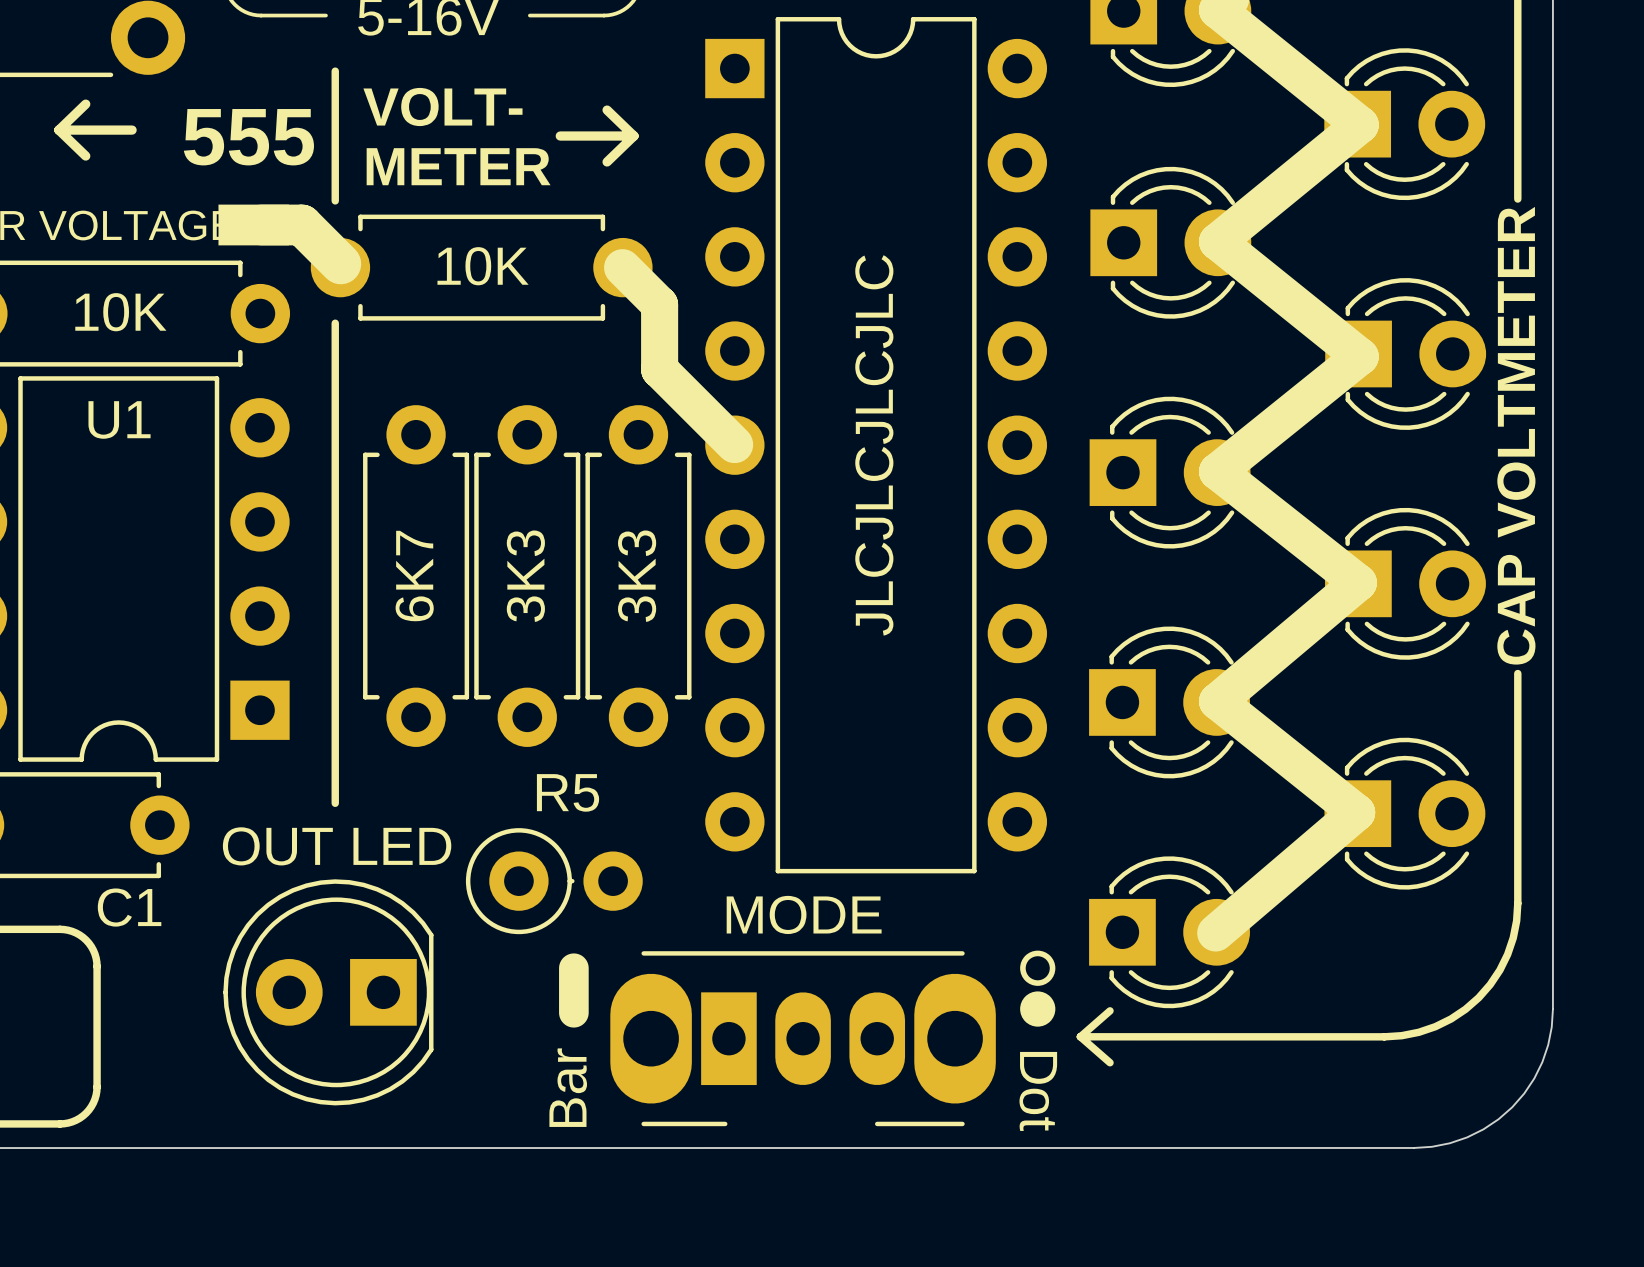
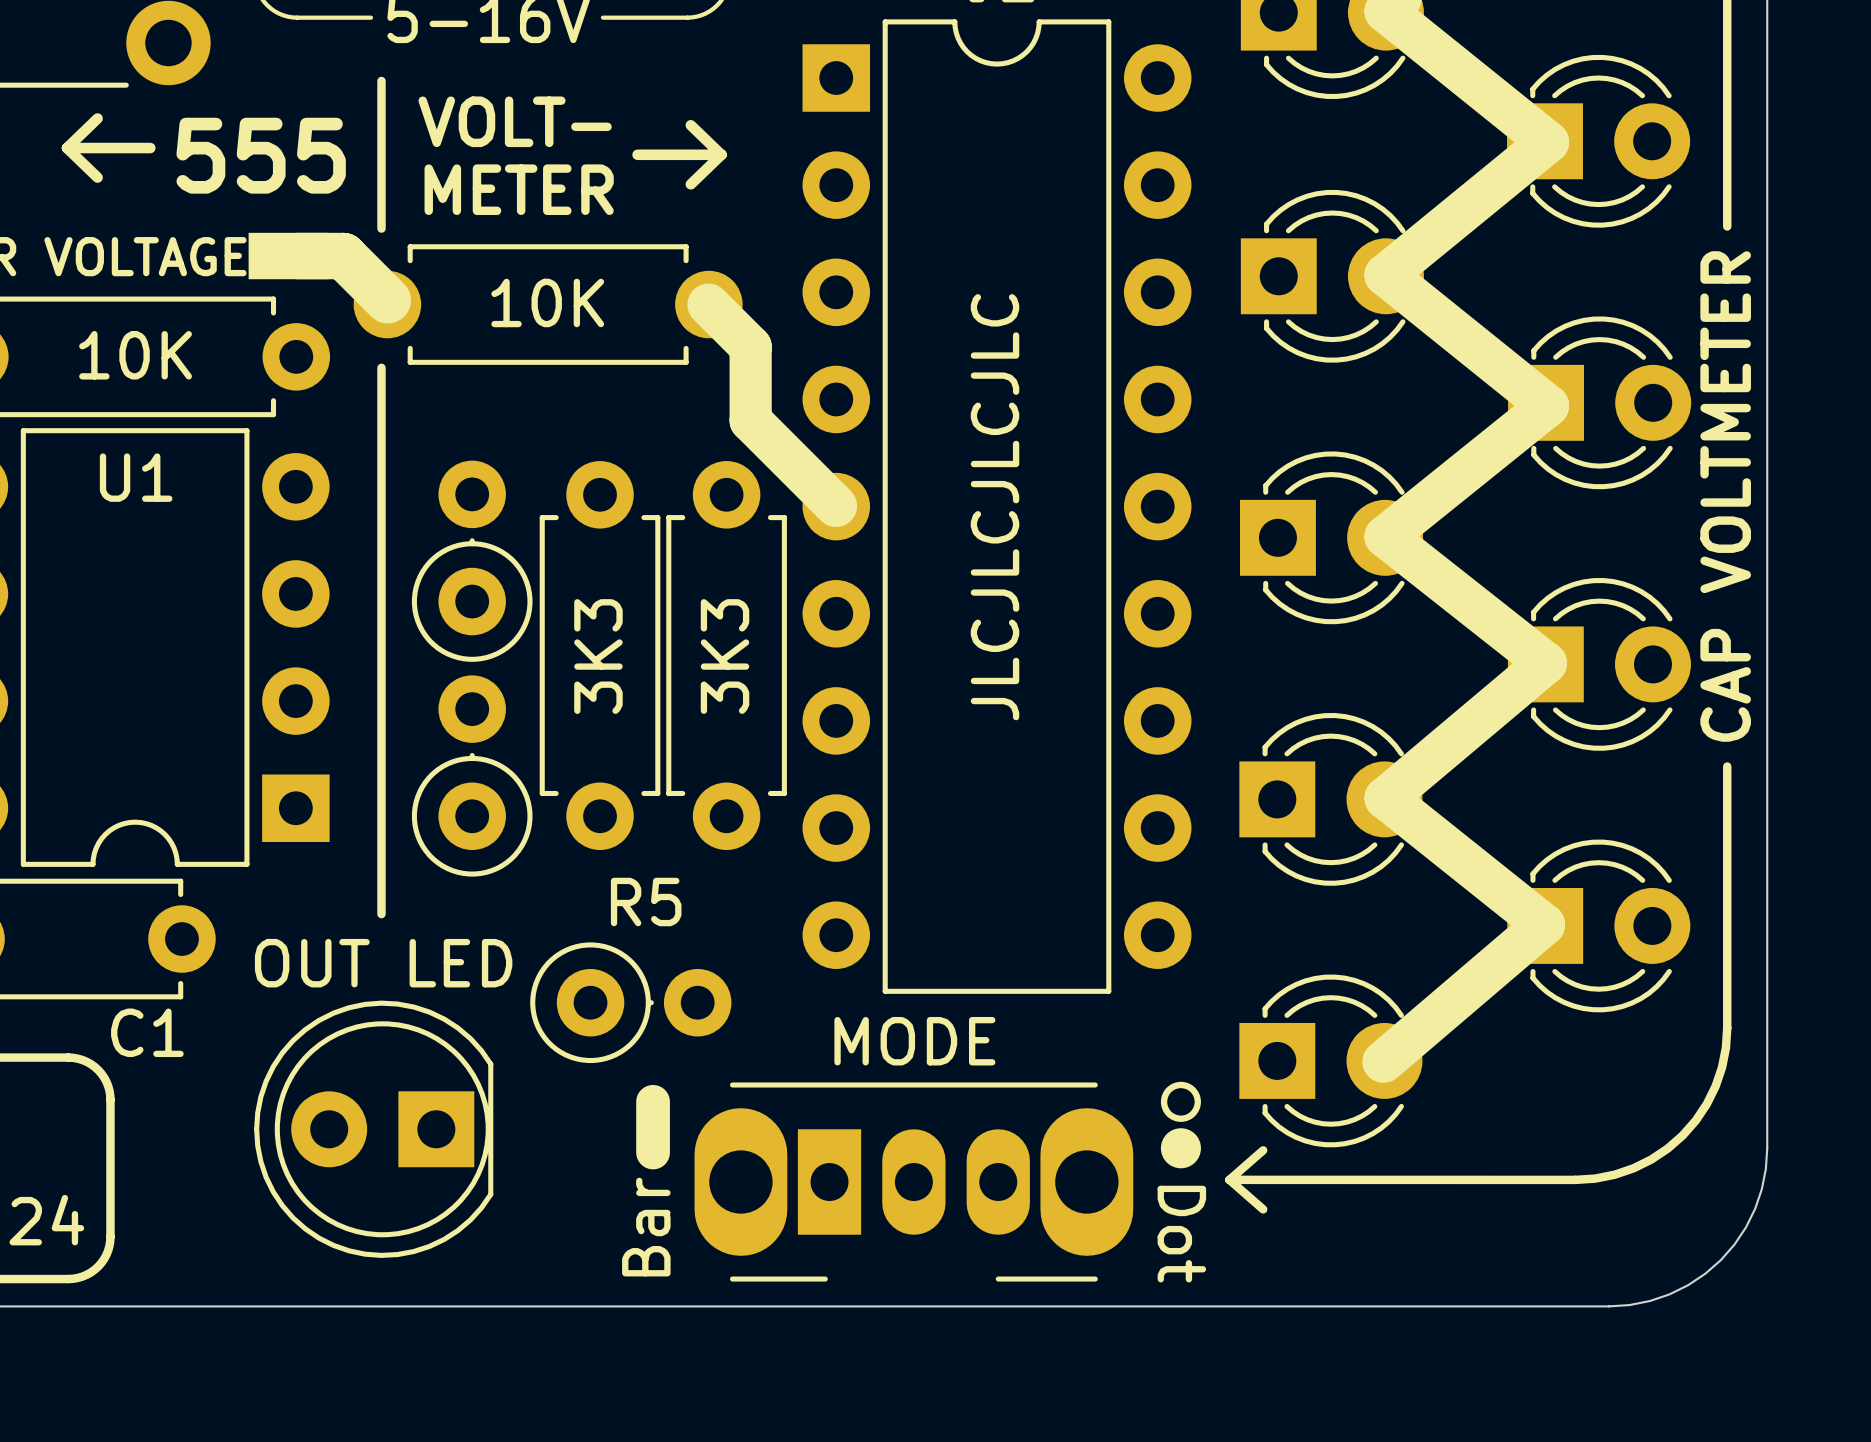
part: none -> (472, 561)
part: 6K7 (416, 576) -> none
part: none -> (472, 775)

